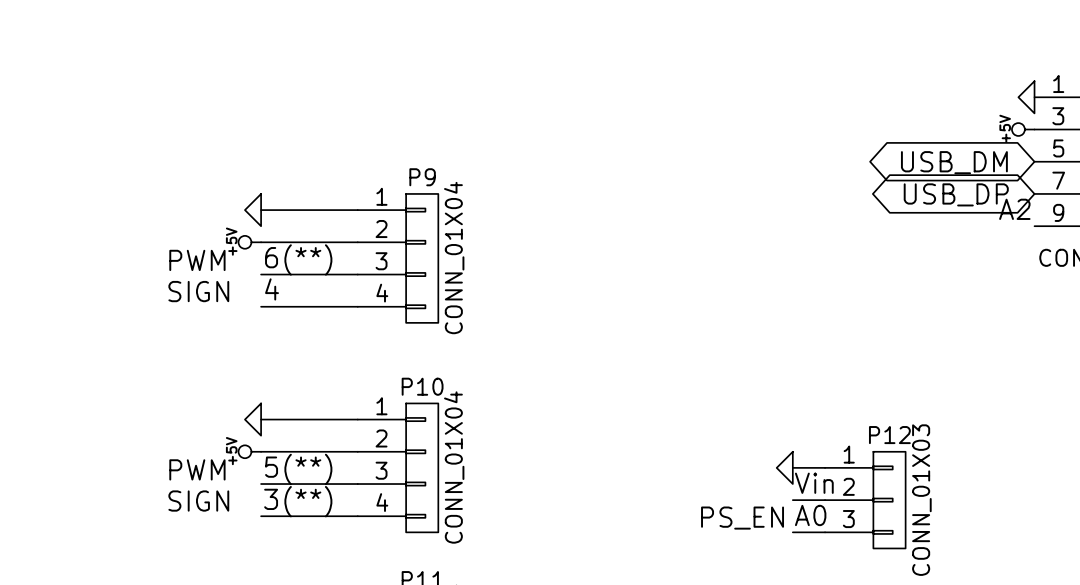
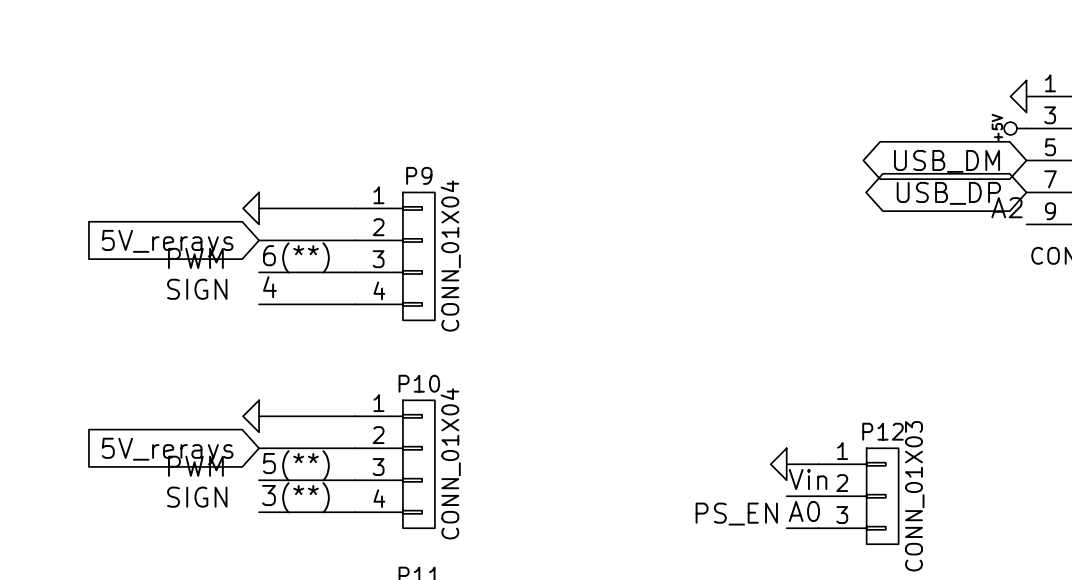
power symbol: +5V (249, 242) -> none
global label: none -> 5V_rerays (167, 243)
power symbol: +5V (249, 451) -> none
global label: none -> 5V_rerays (167, 451)

